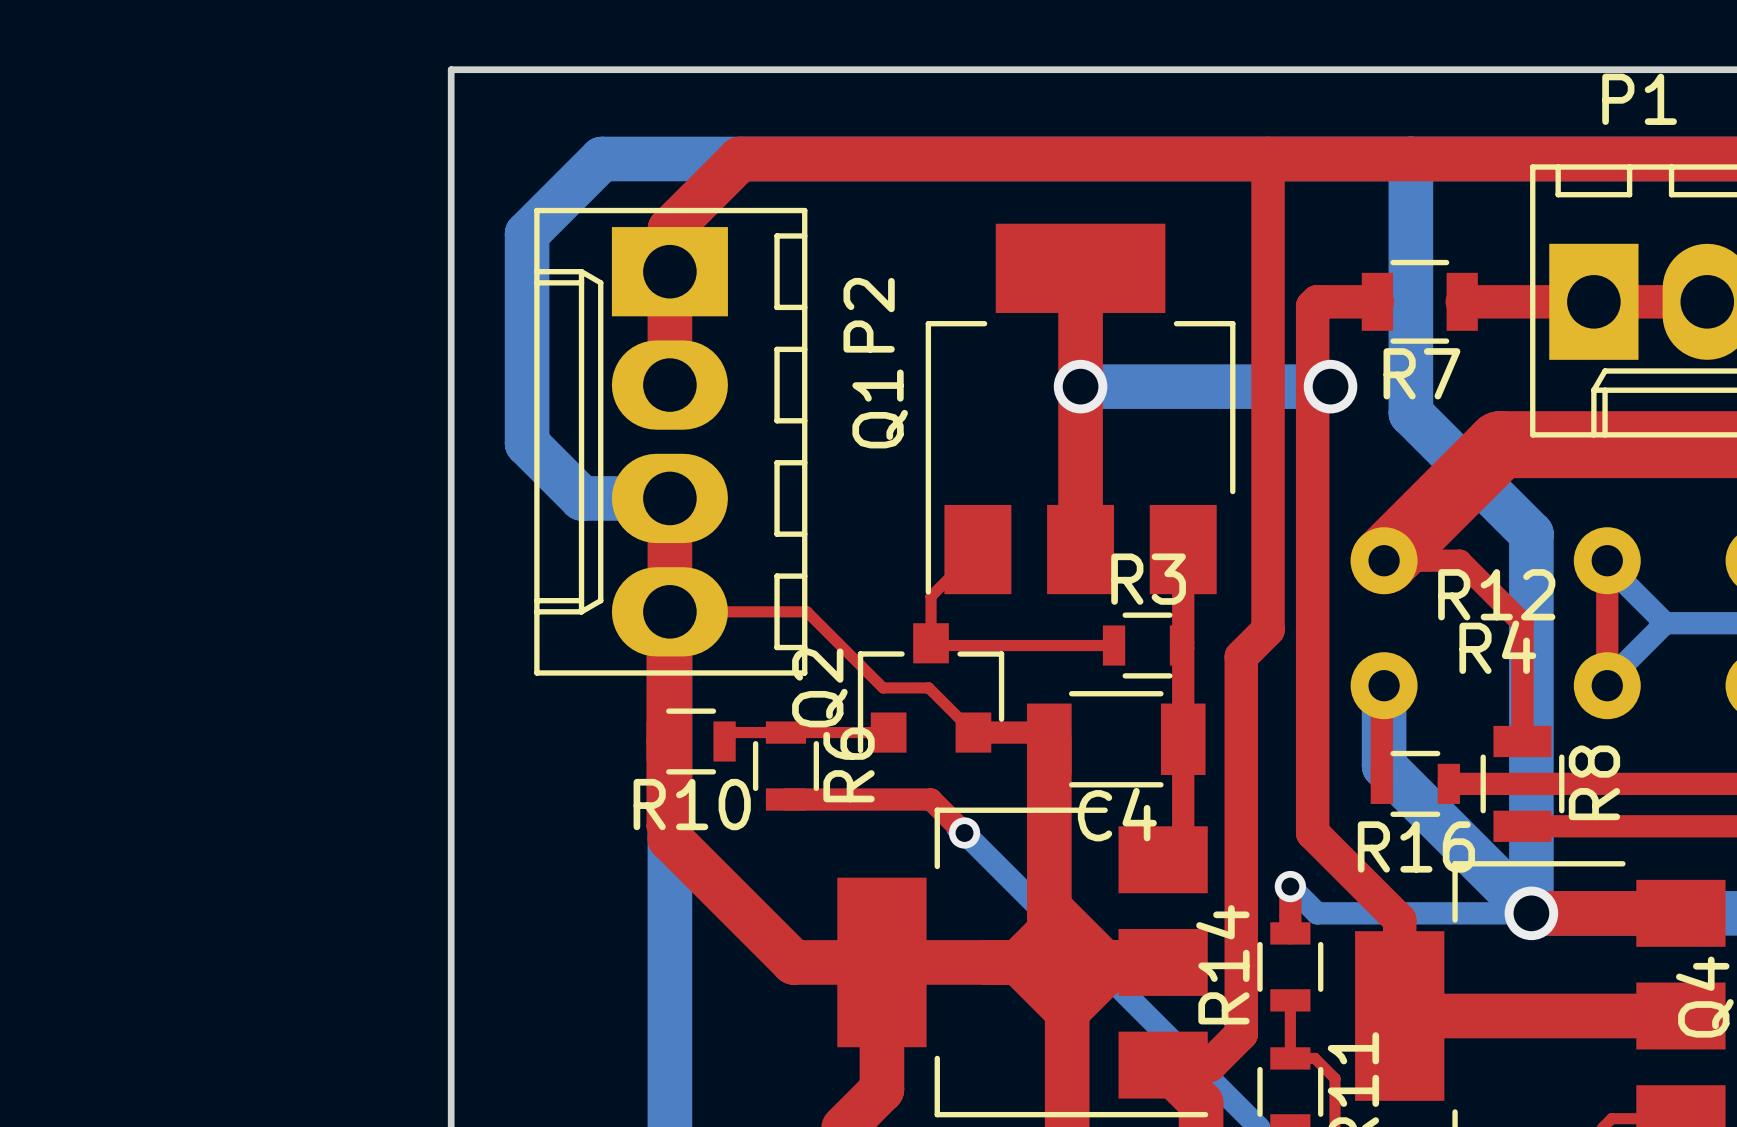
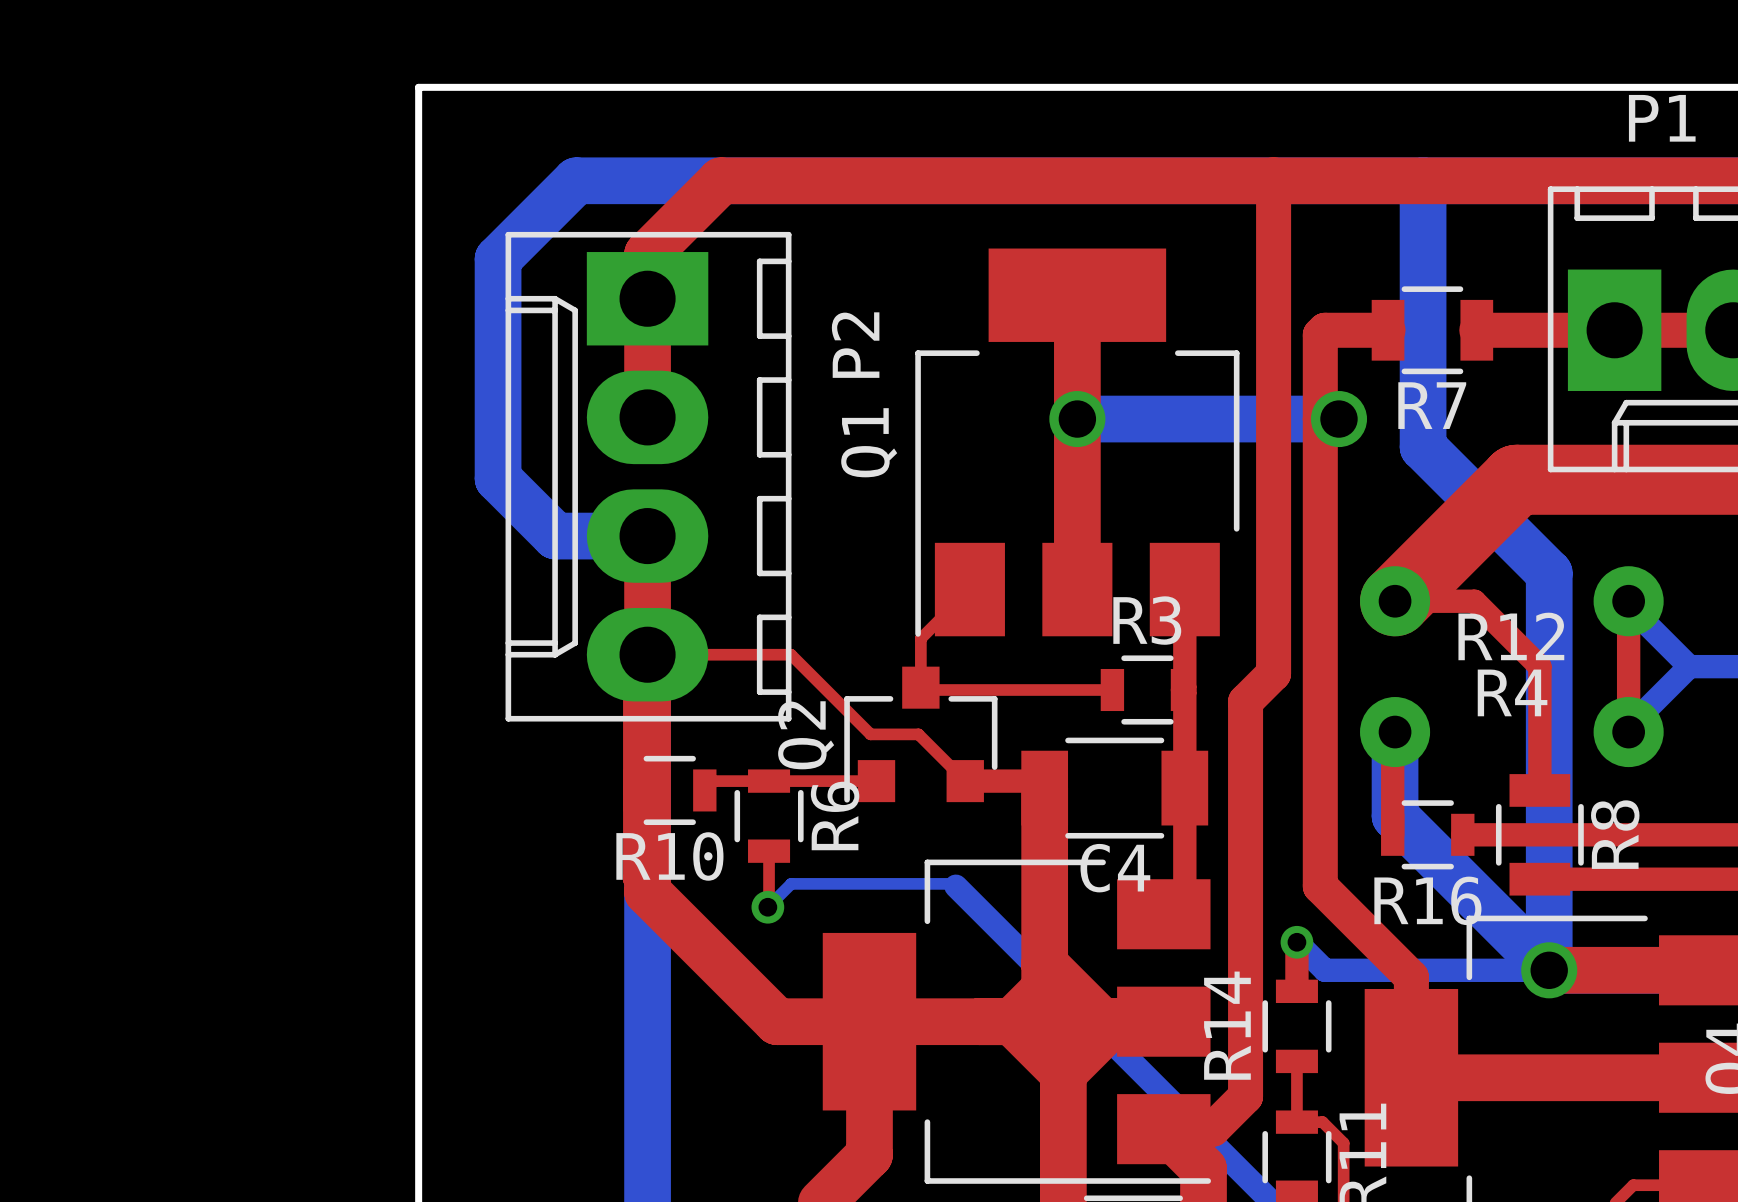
top track: (785, 799) (931, 799) (964, 832) -> (769, 851) (767, 907)
bottom track: none -> (943, 883) (791, 883) (767, 907)
via position: (964, 832) -> (767, 907)

